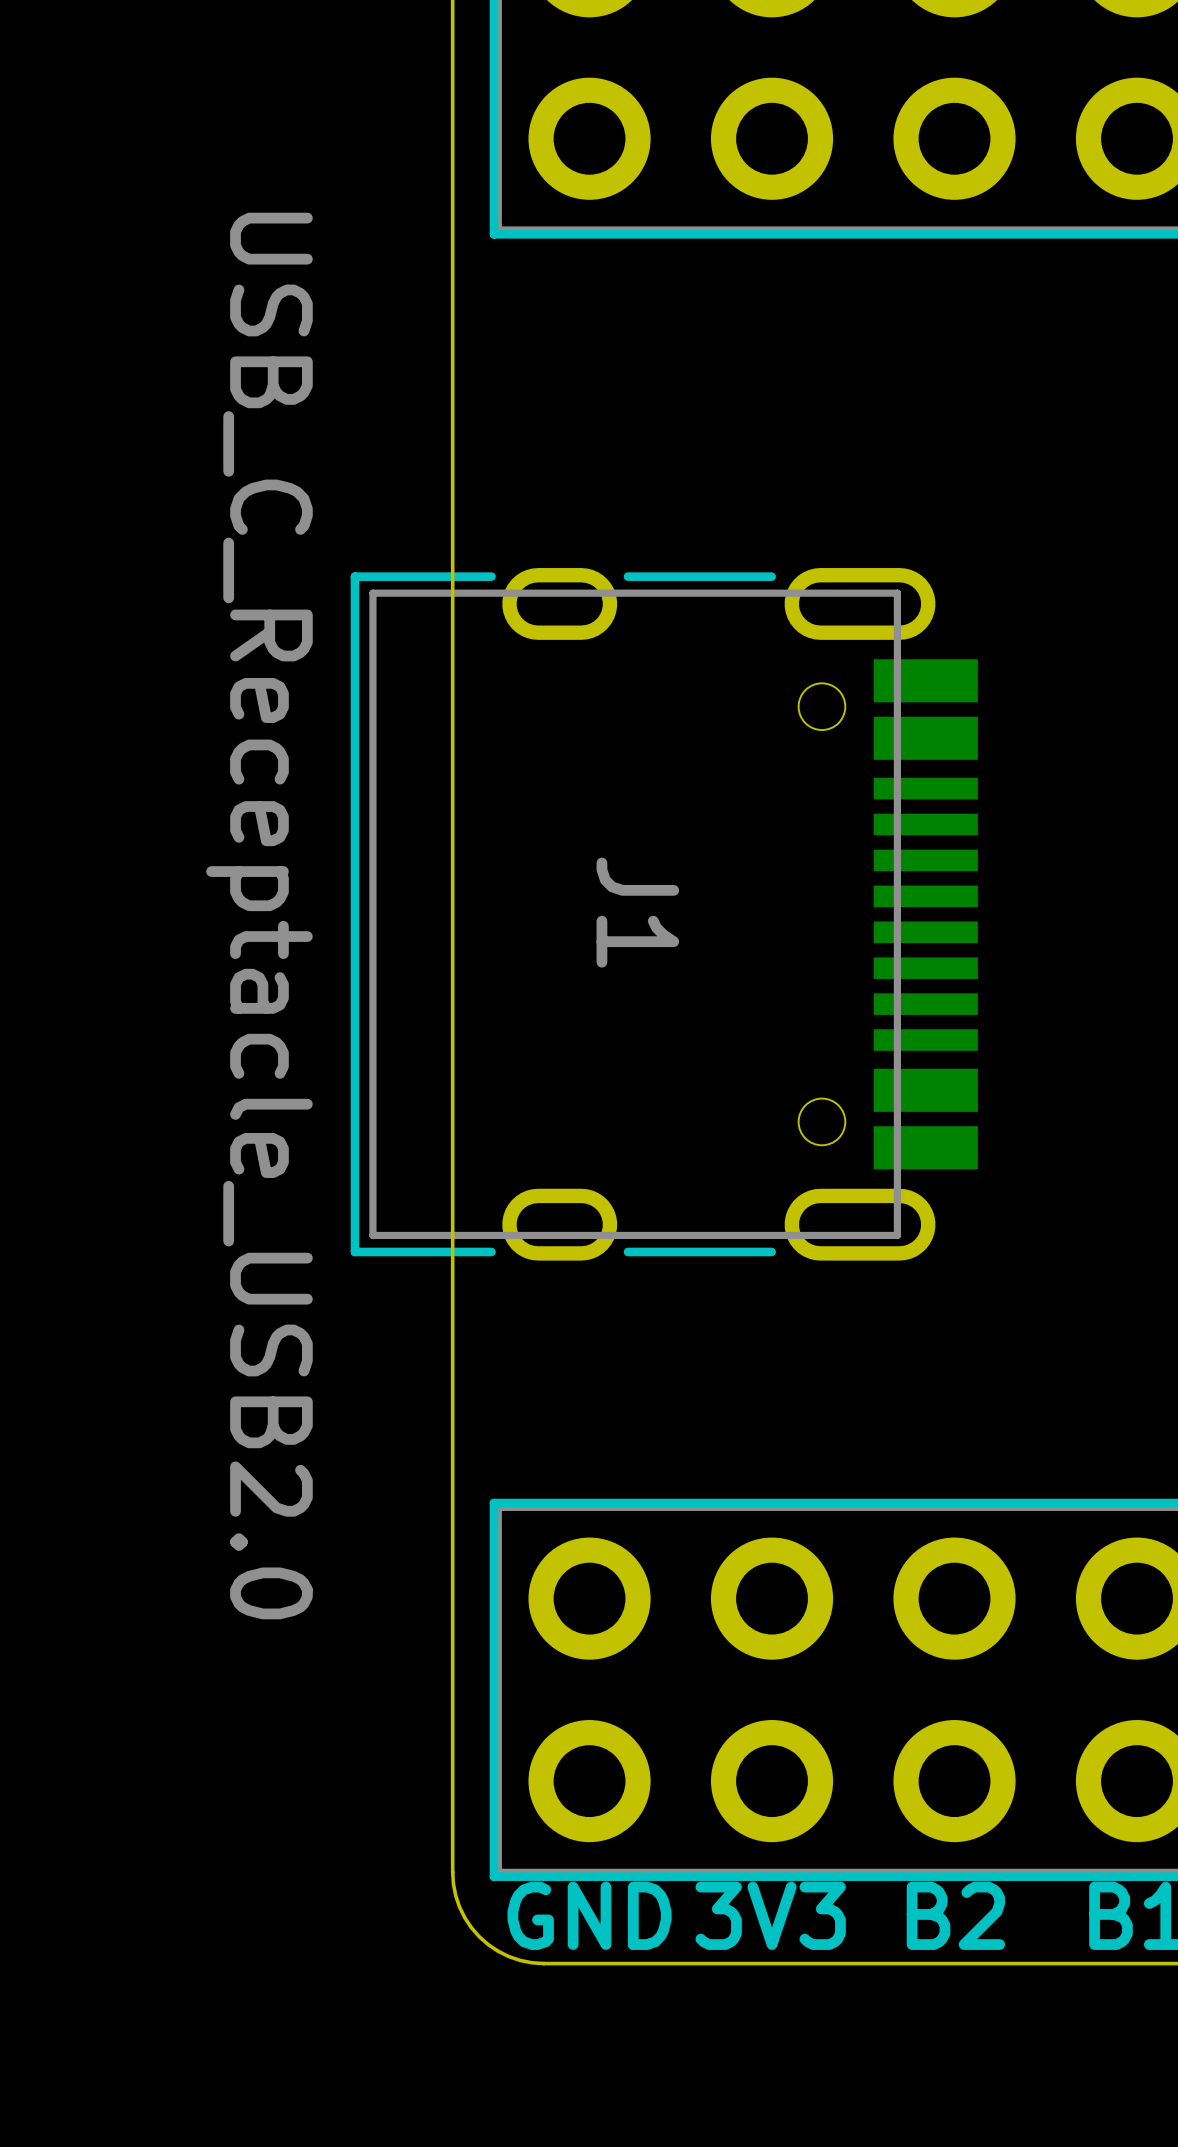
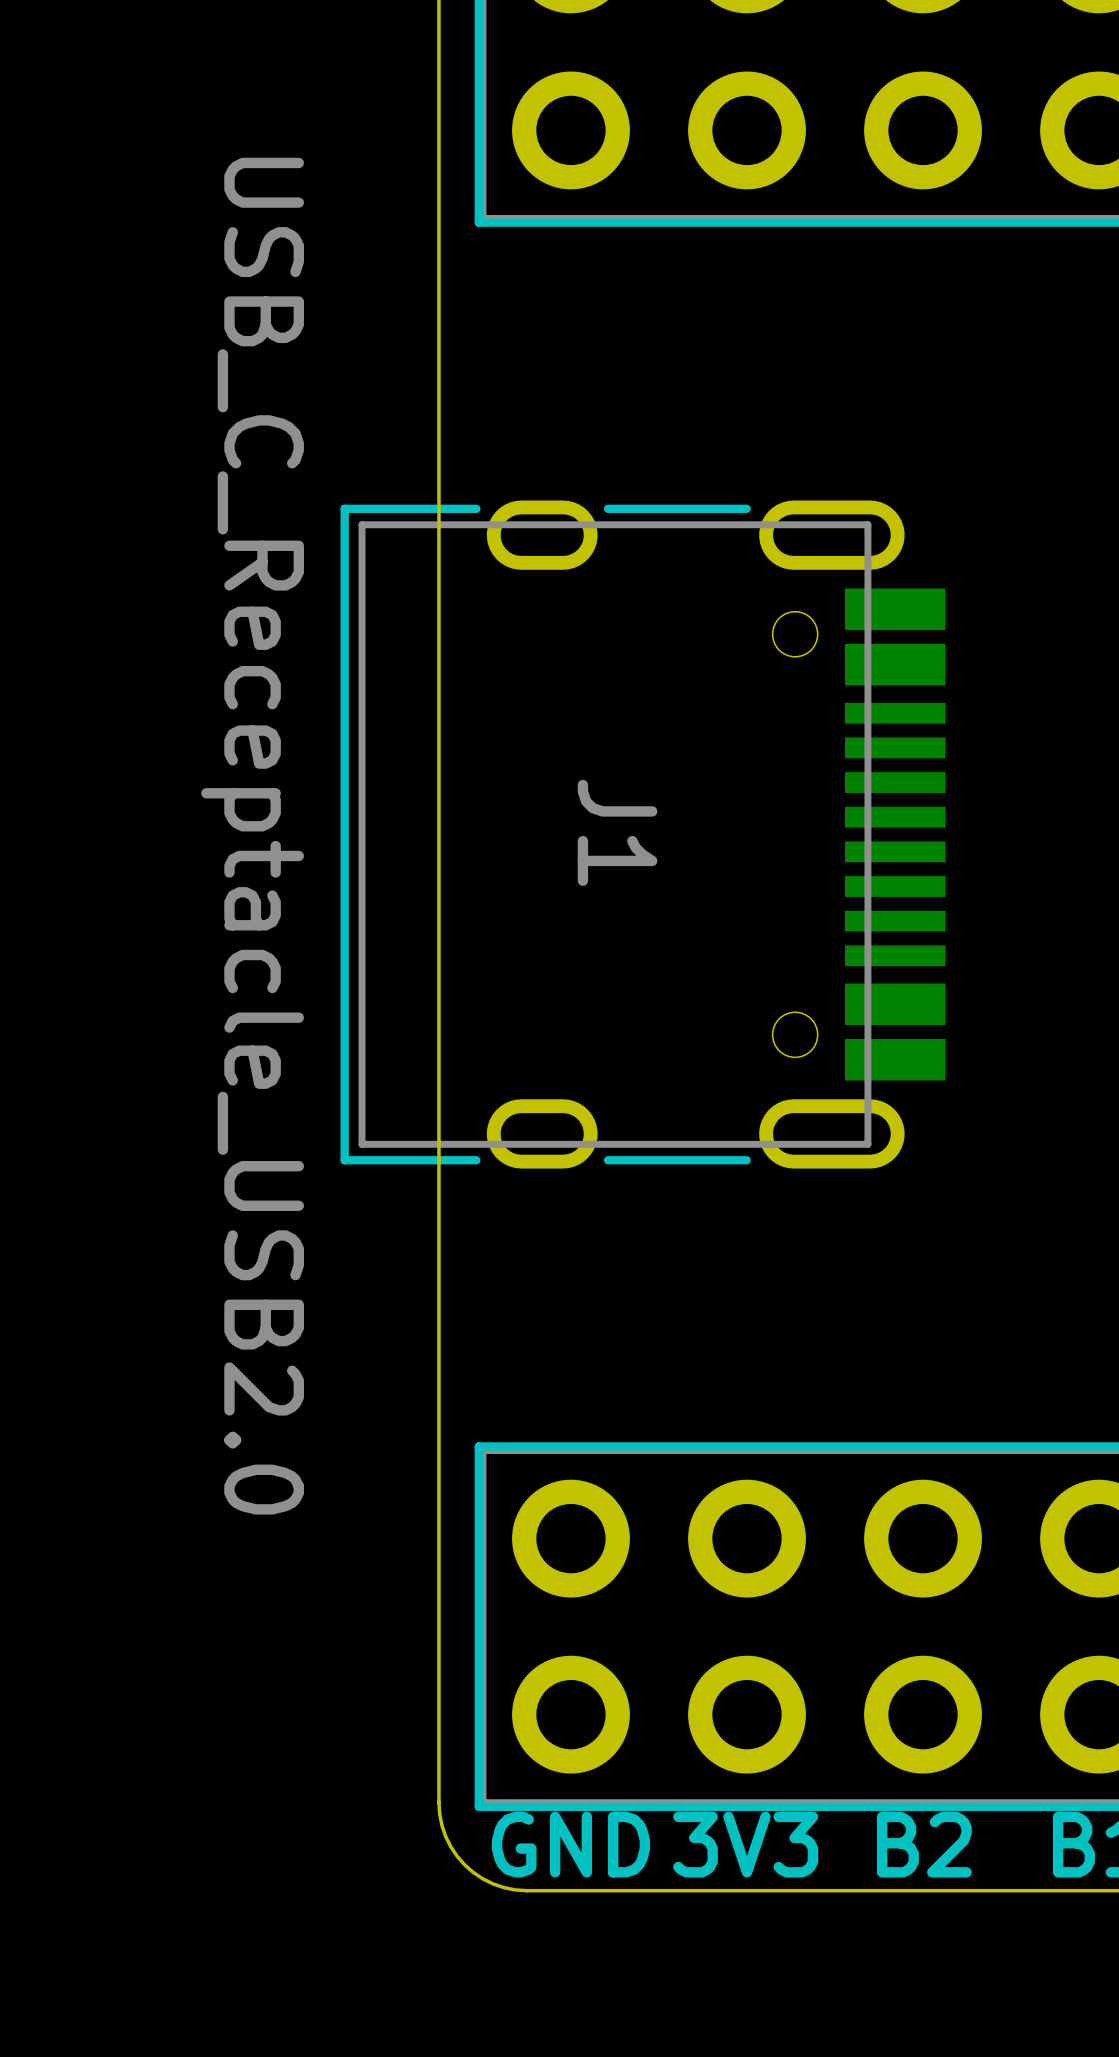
J1 position: (664, 914) -> (643, 834)

